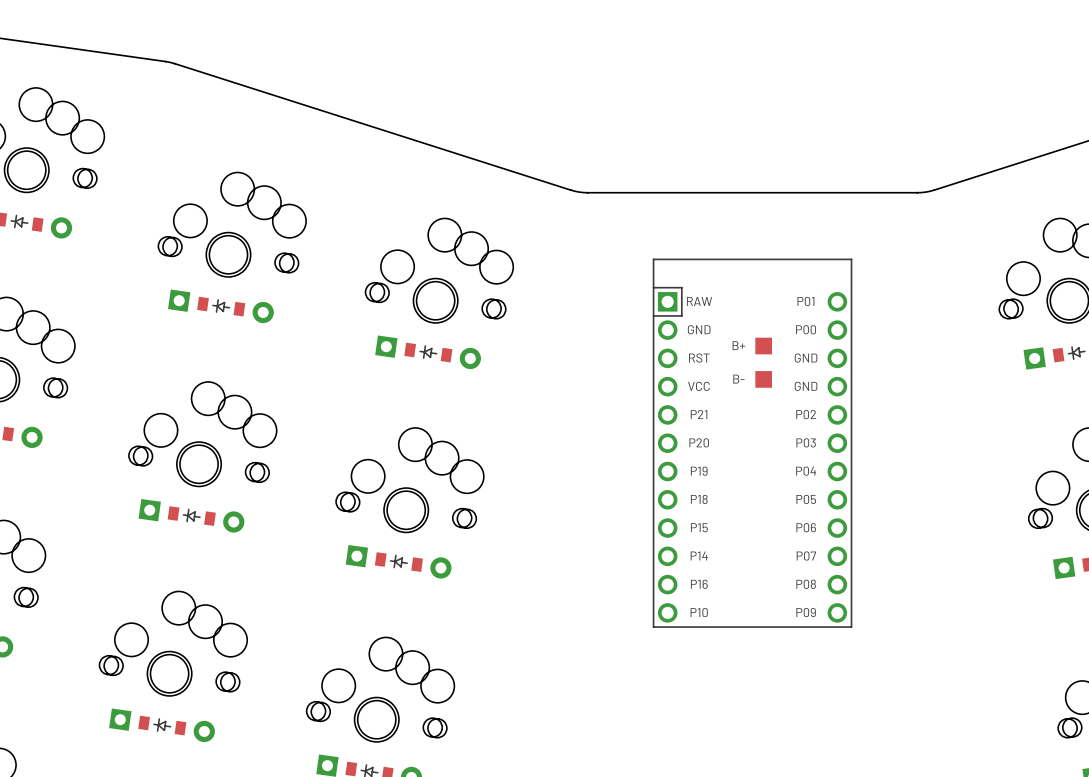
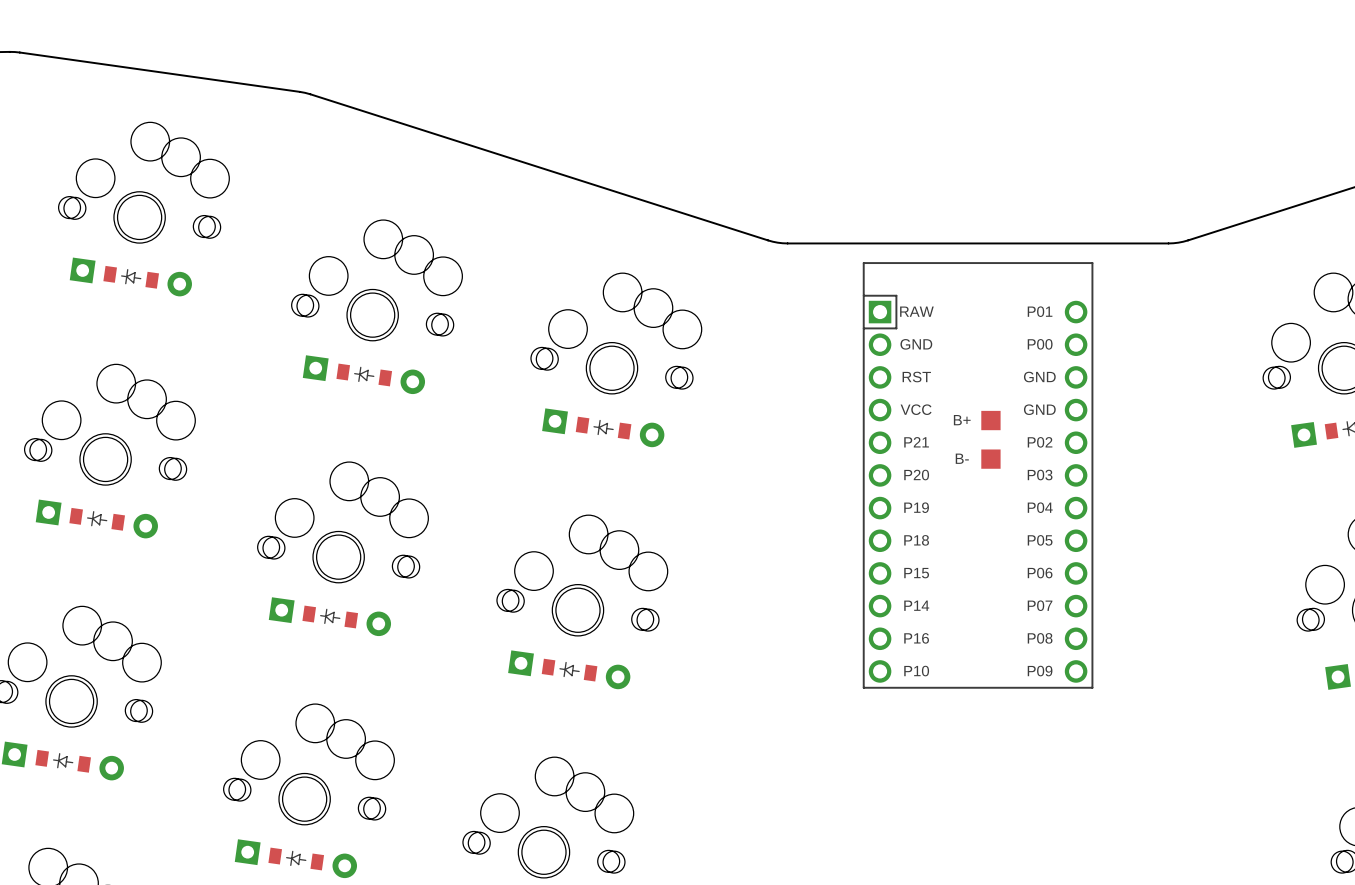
part position: (752, 443) -> (978, 475)

